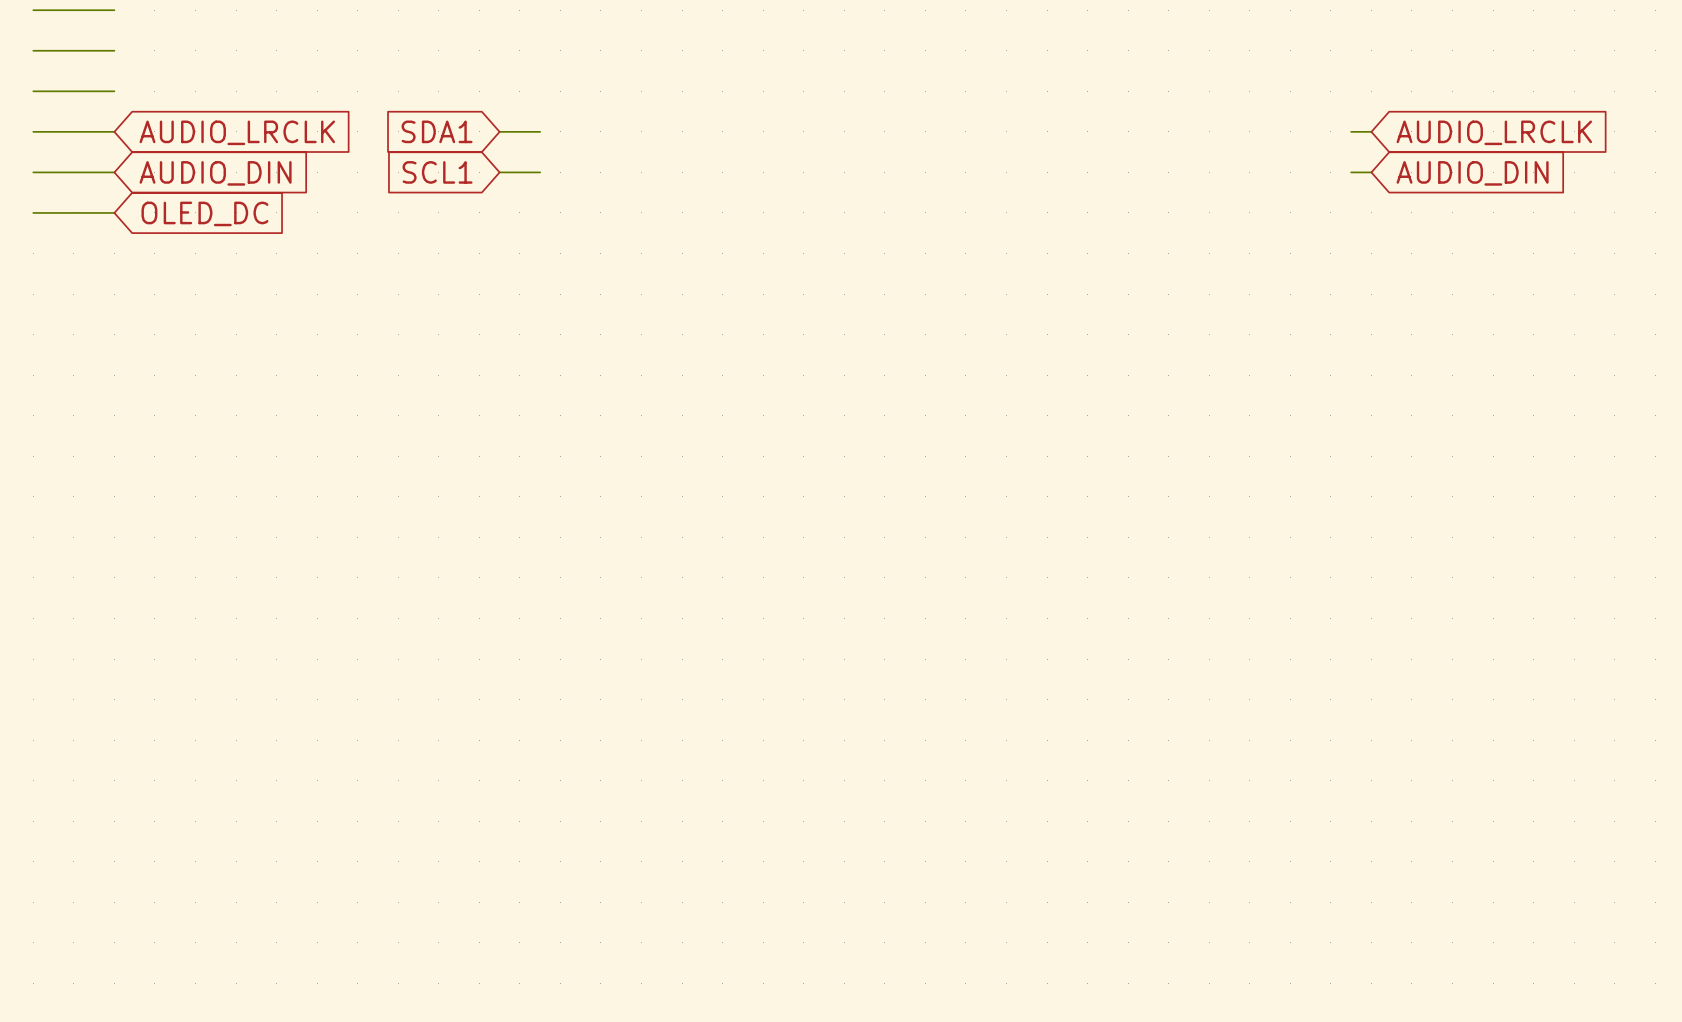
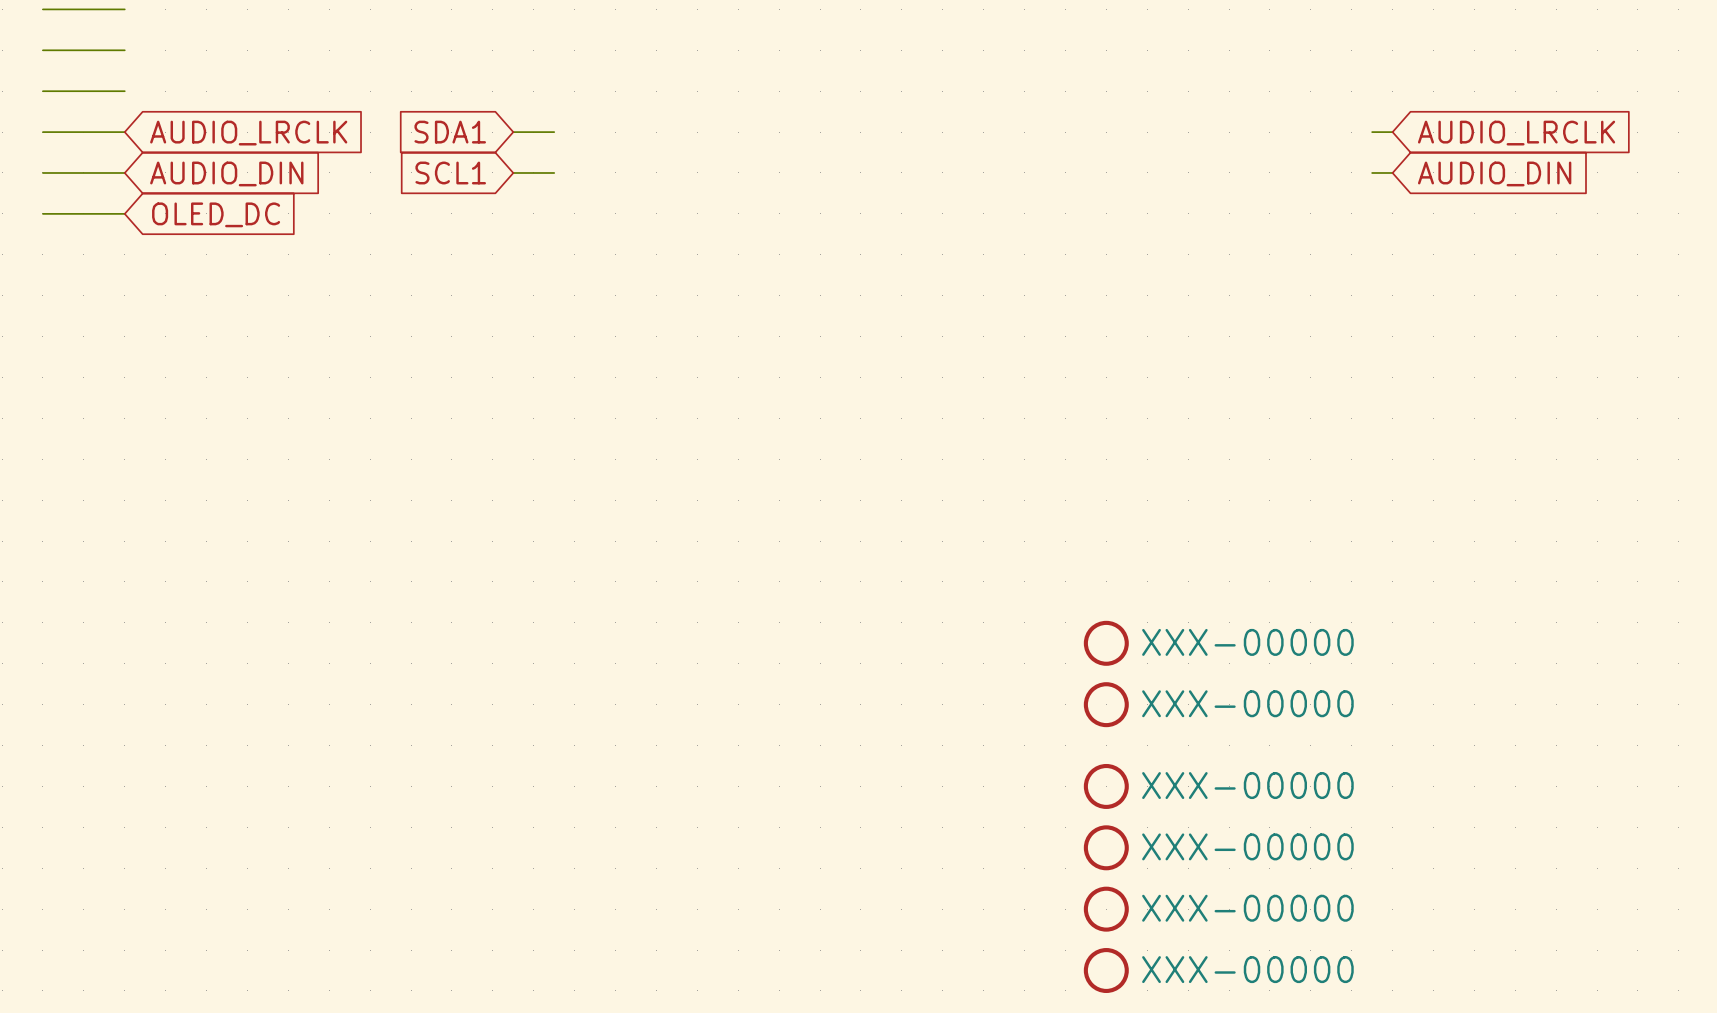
part: none -> (1106, 643)
part: none -> (1106, 704)
part: none -> (1106, 786)
part: none -> (1106, 847)
part: none -> (1106, 909)
part: none -> (1106, 970)

